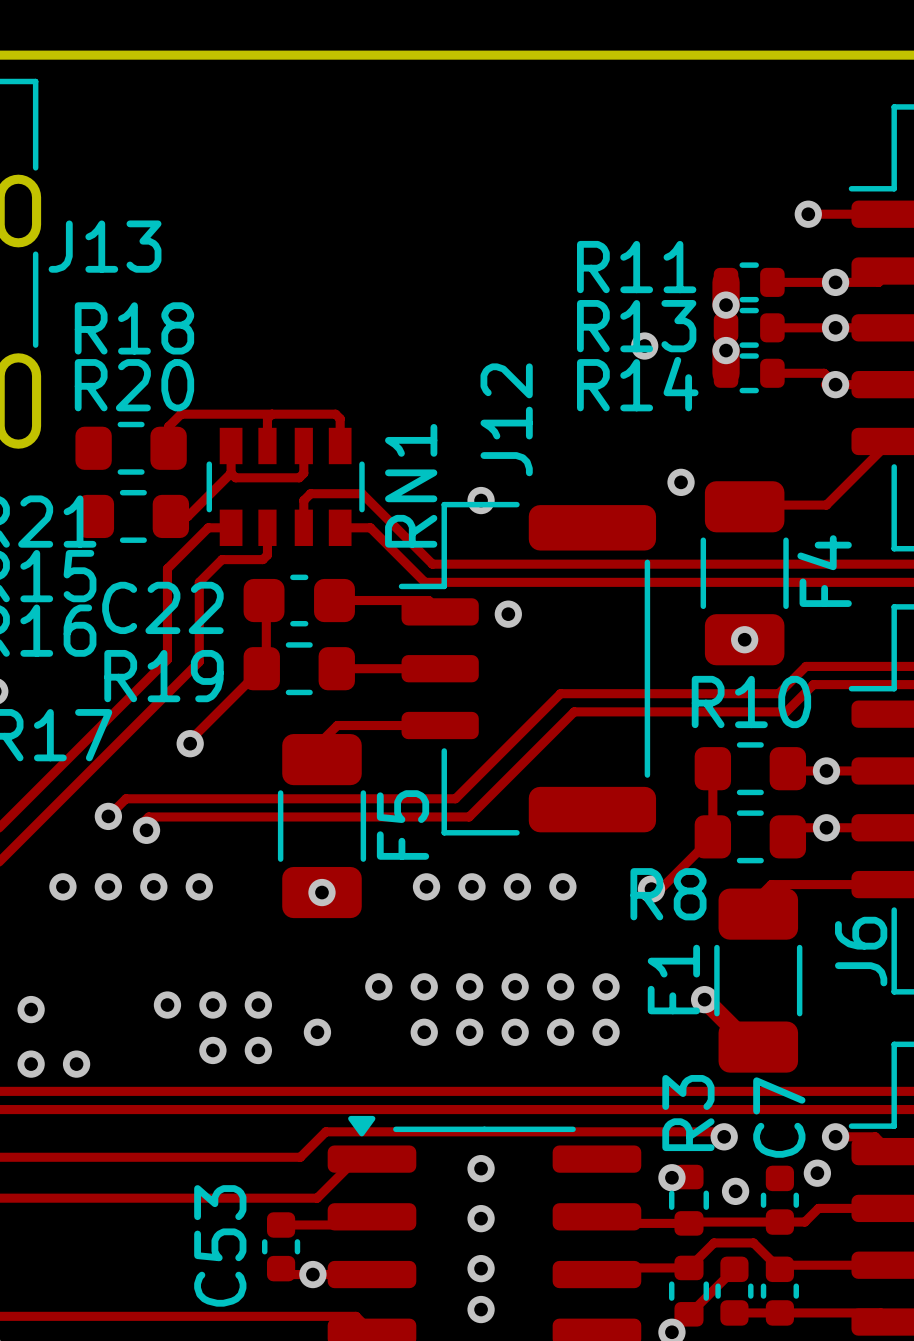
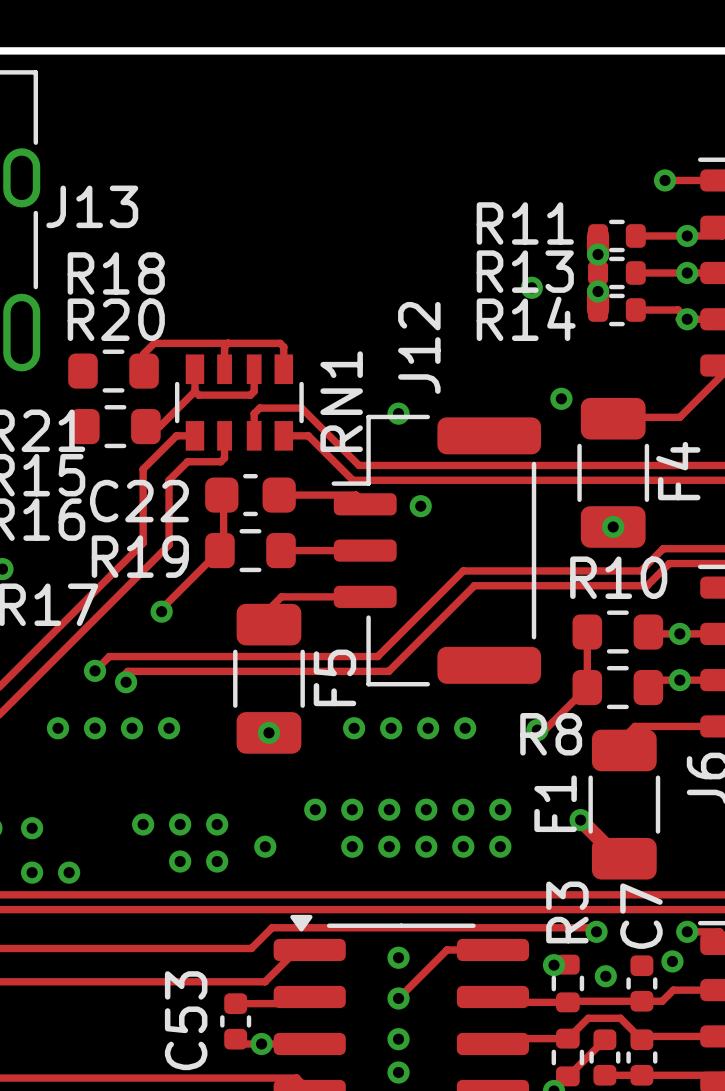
track: none -> (492, 949) (447, 949) (398, 998)

